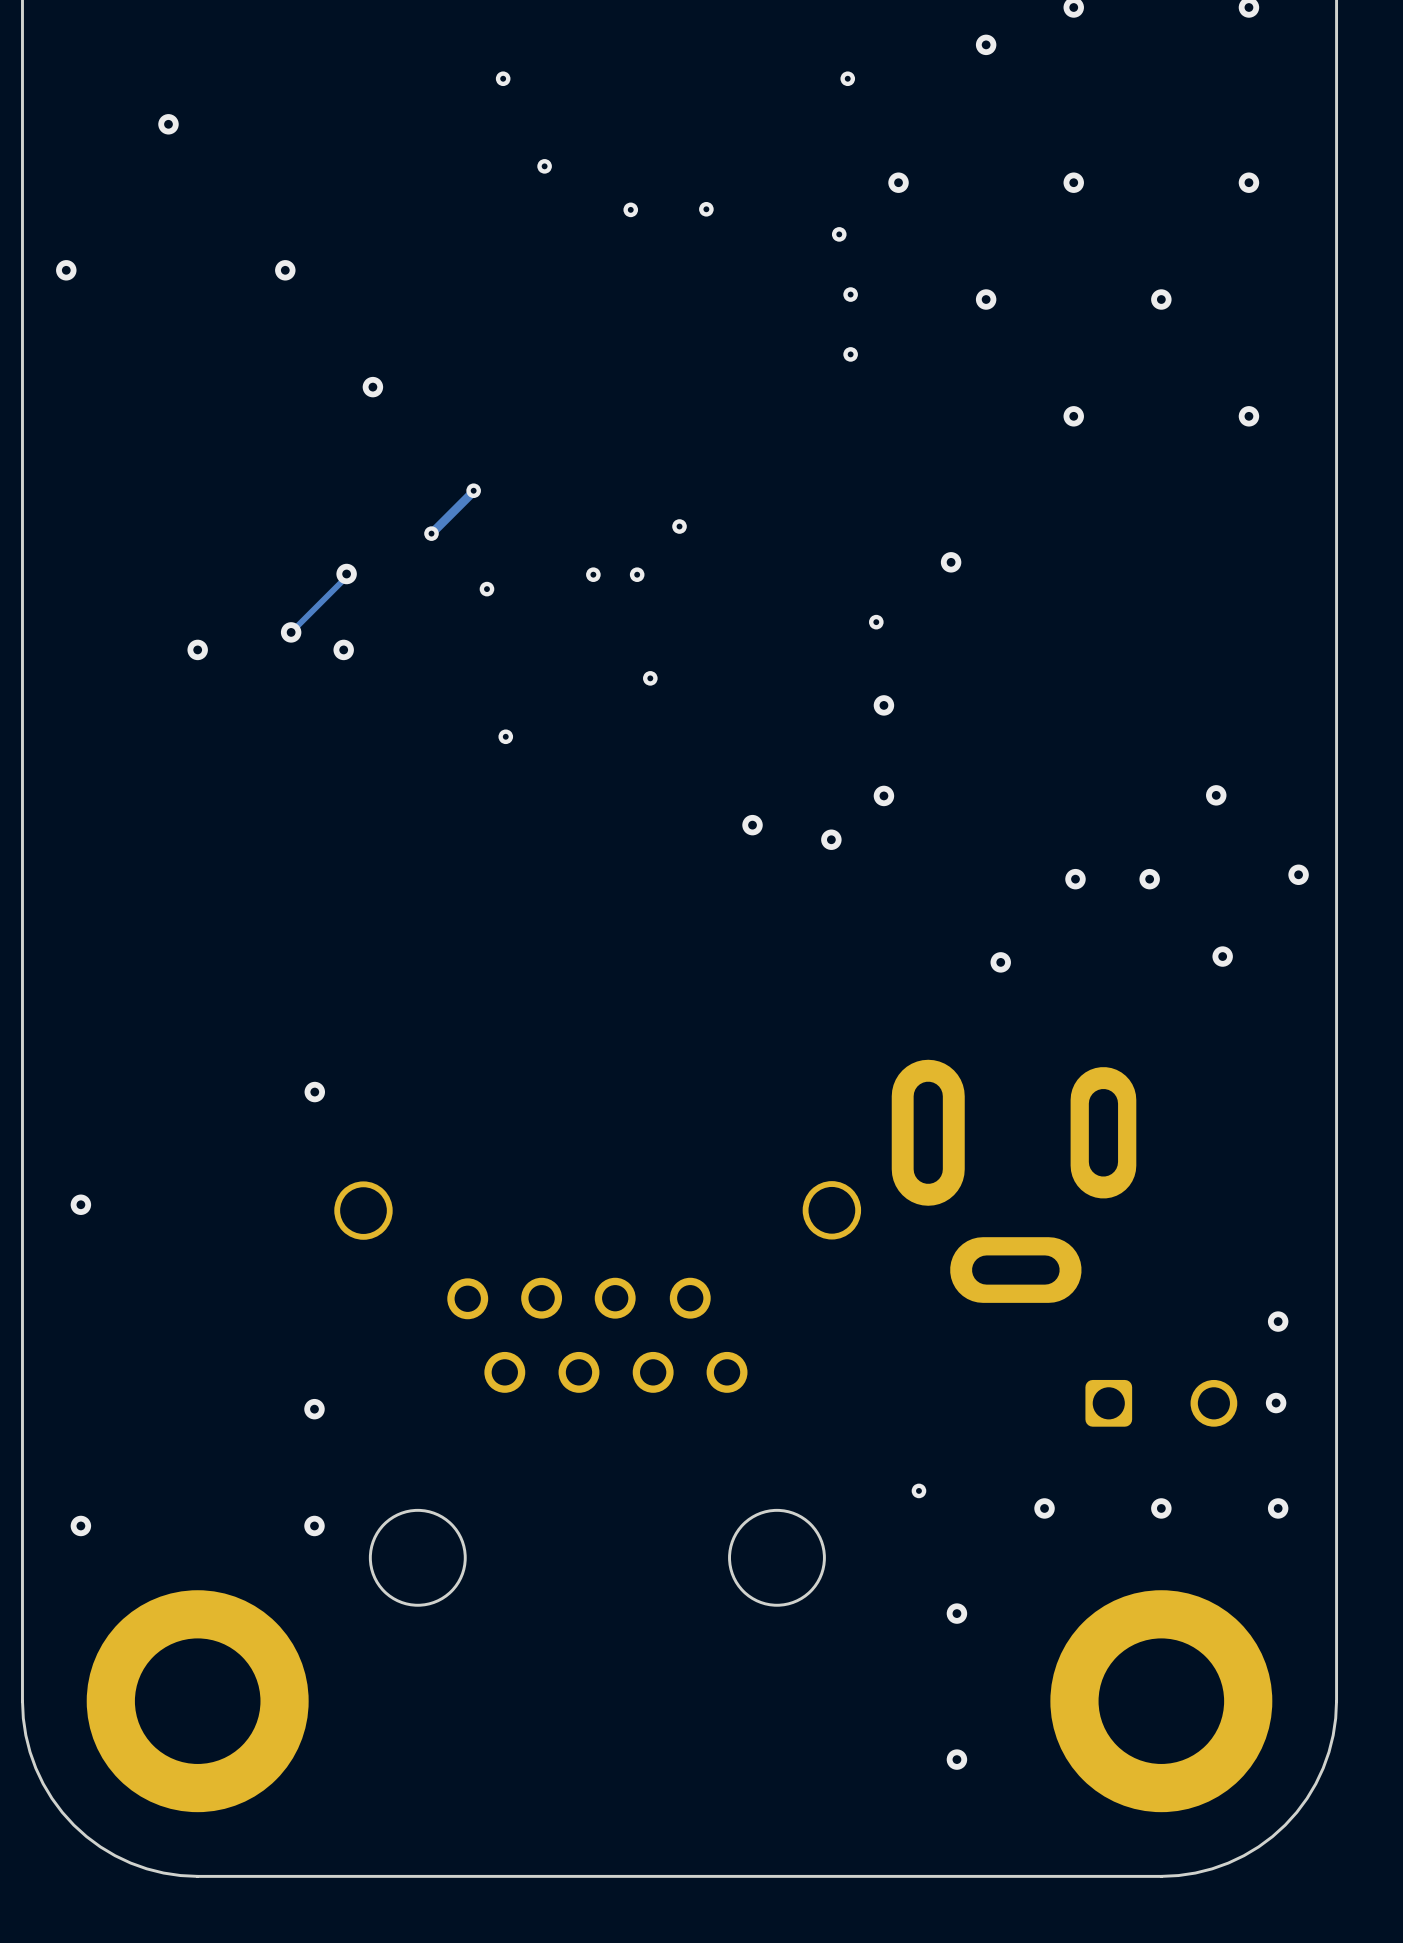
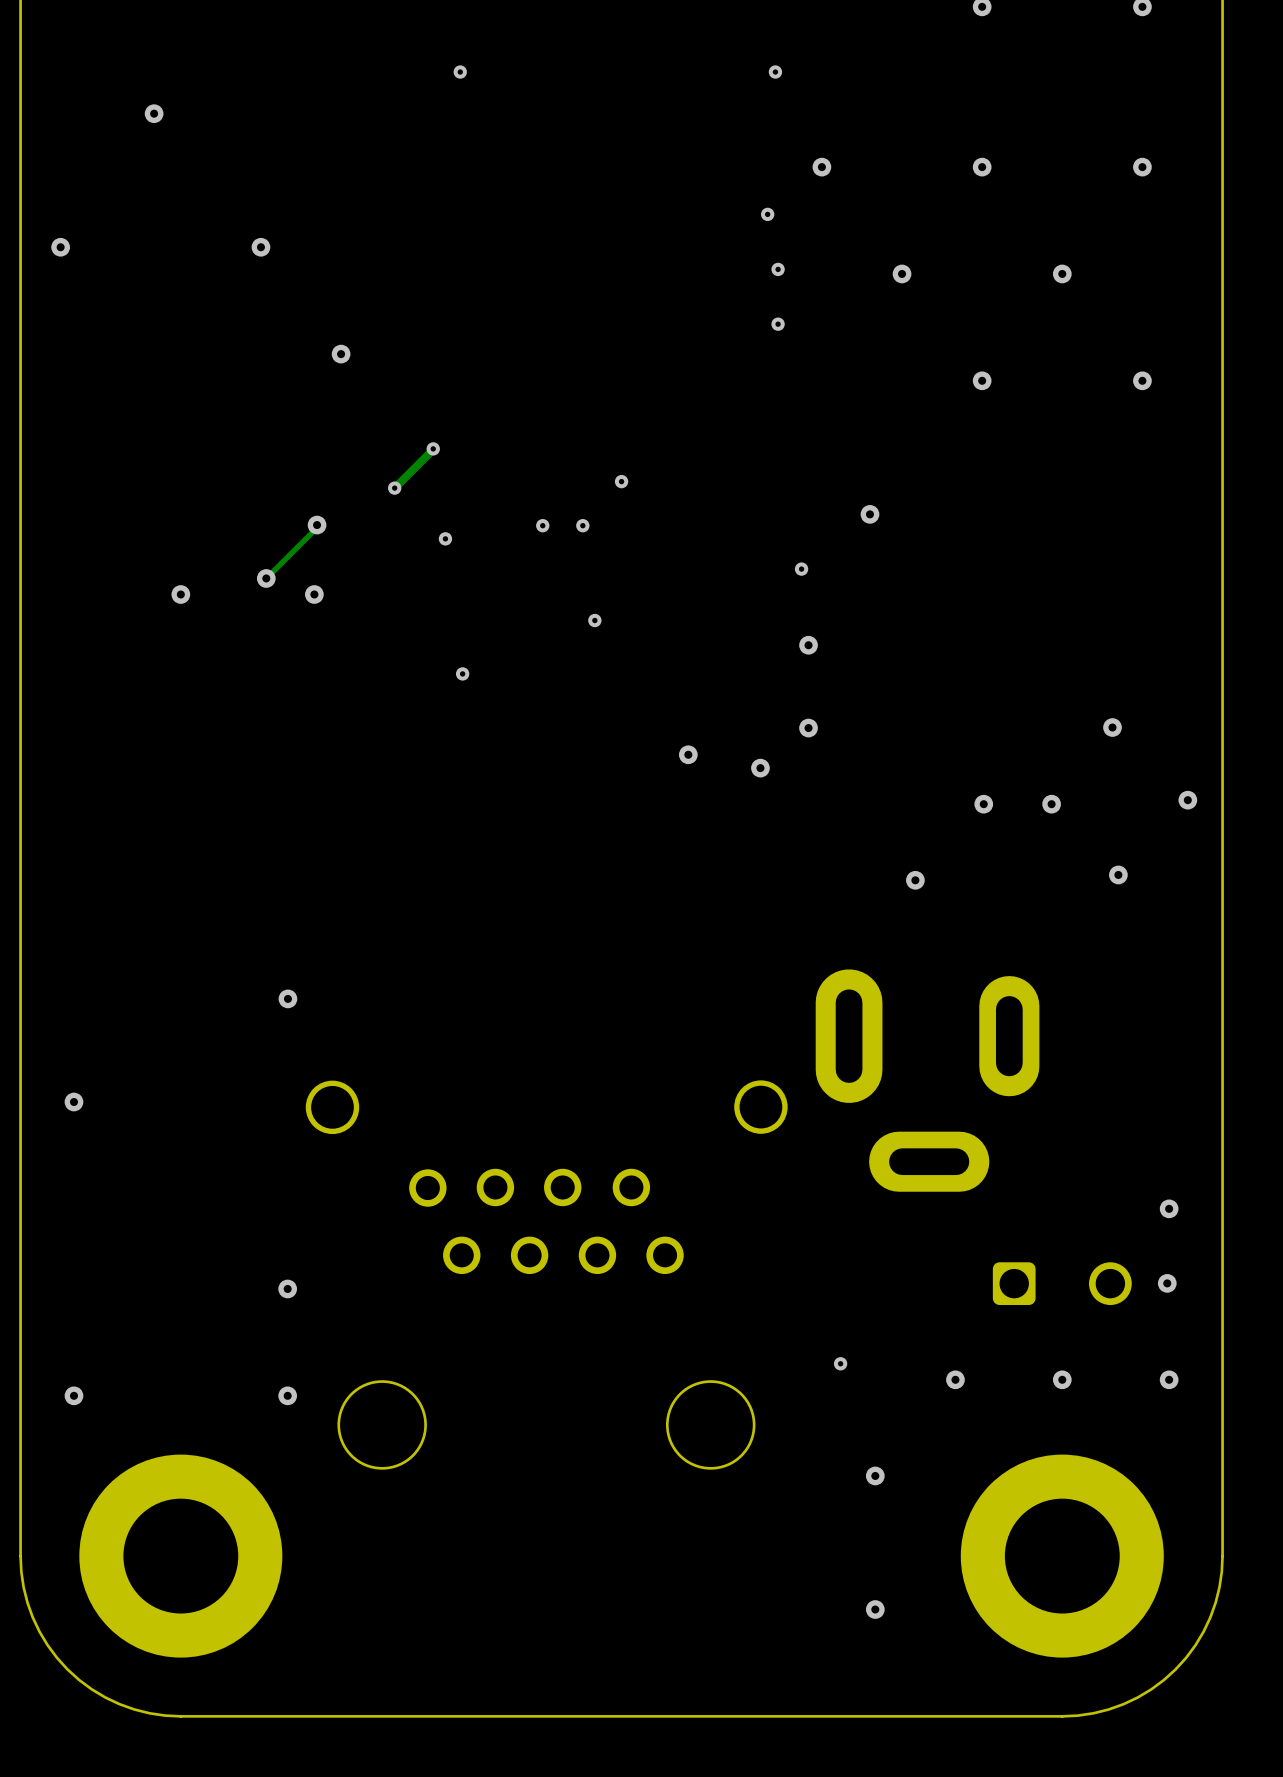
via: (986, 44) -> none
via: (544, 166) -> none
via: (630, 209) -> none
via: (706, 209) -> none

